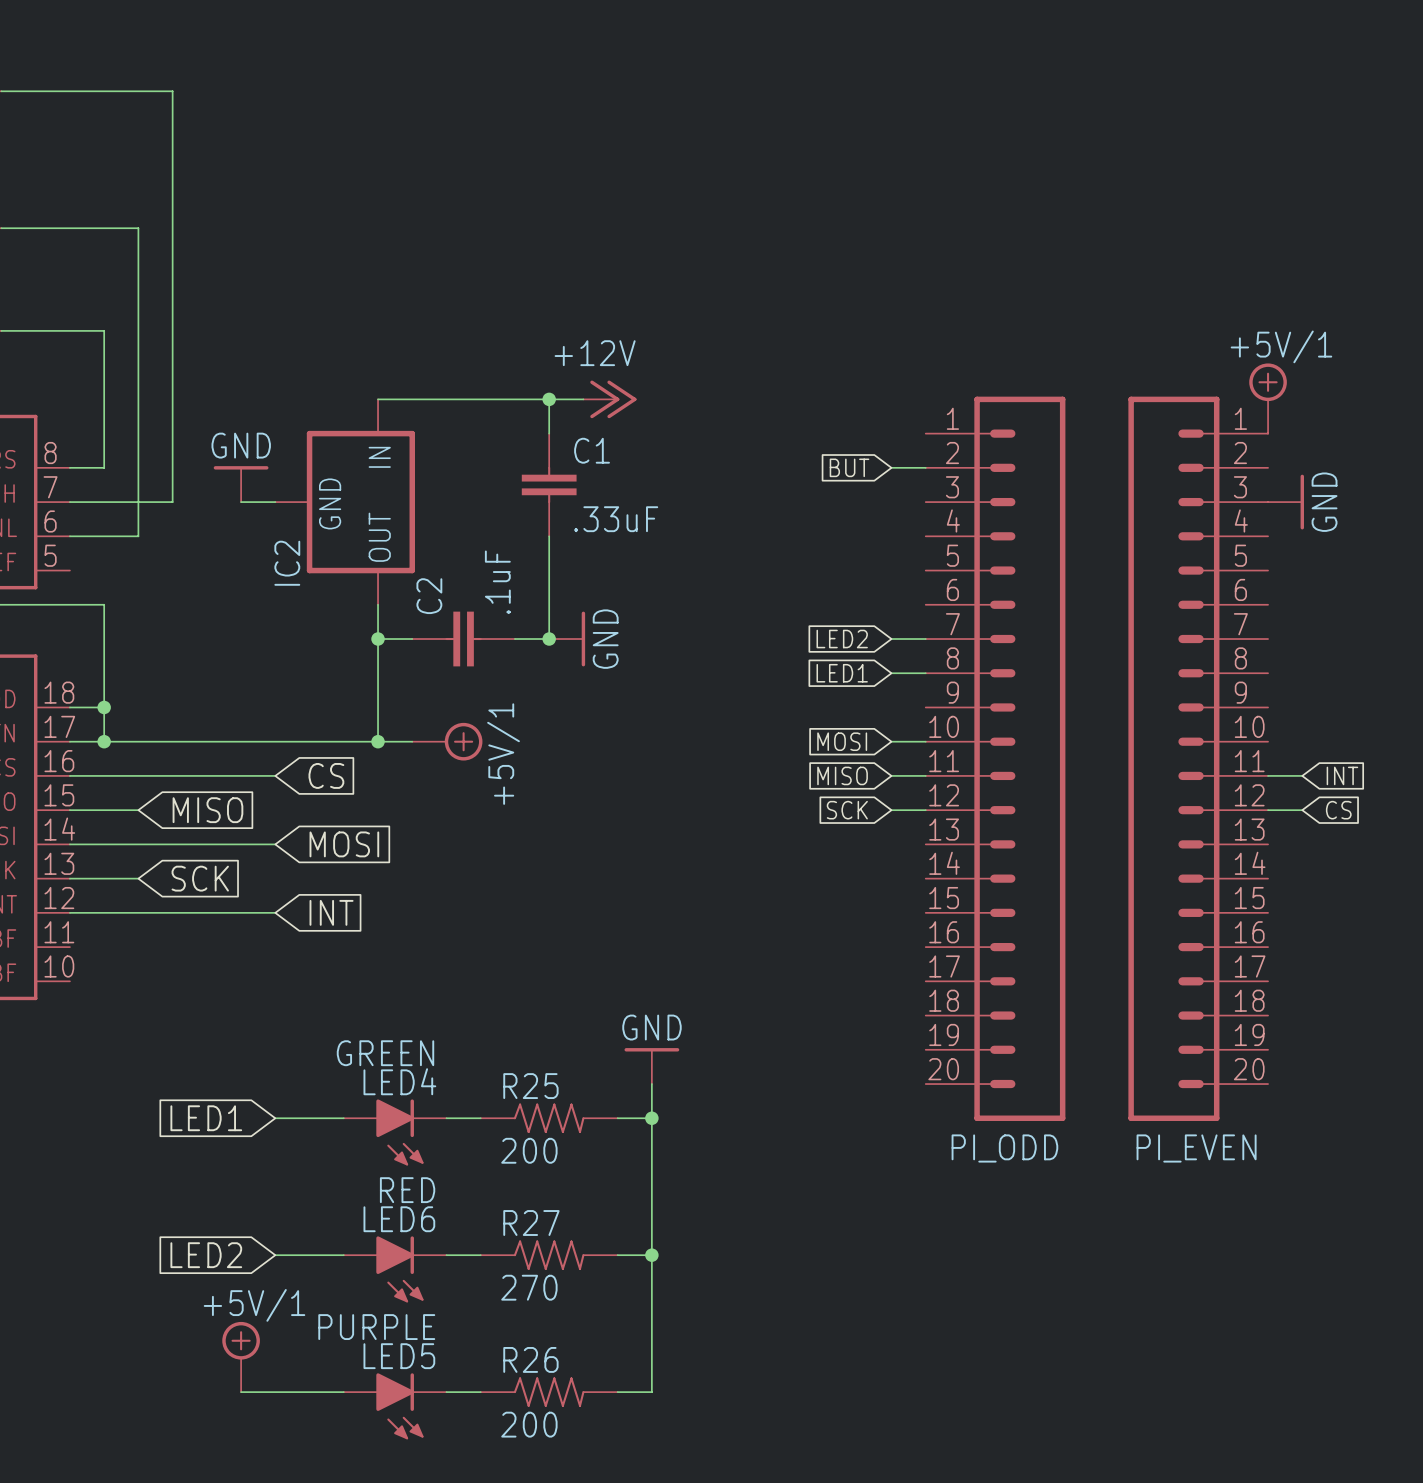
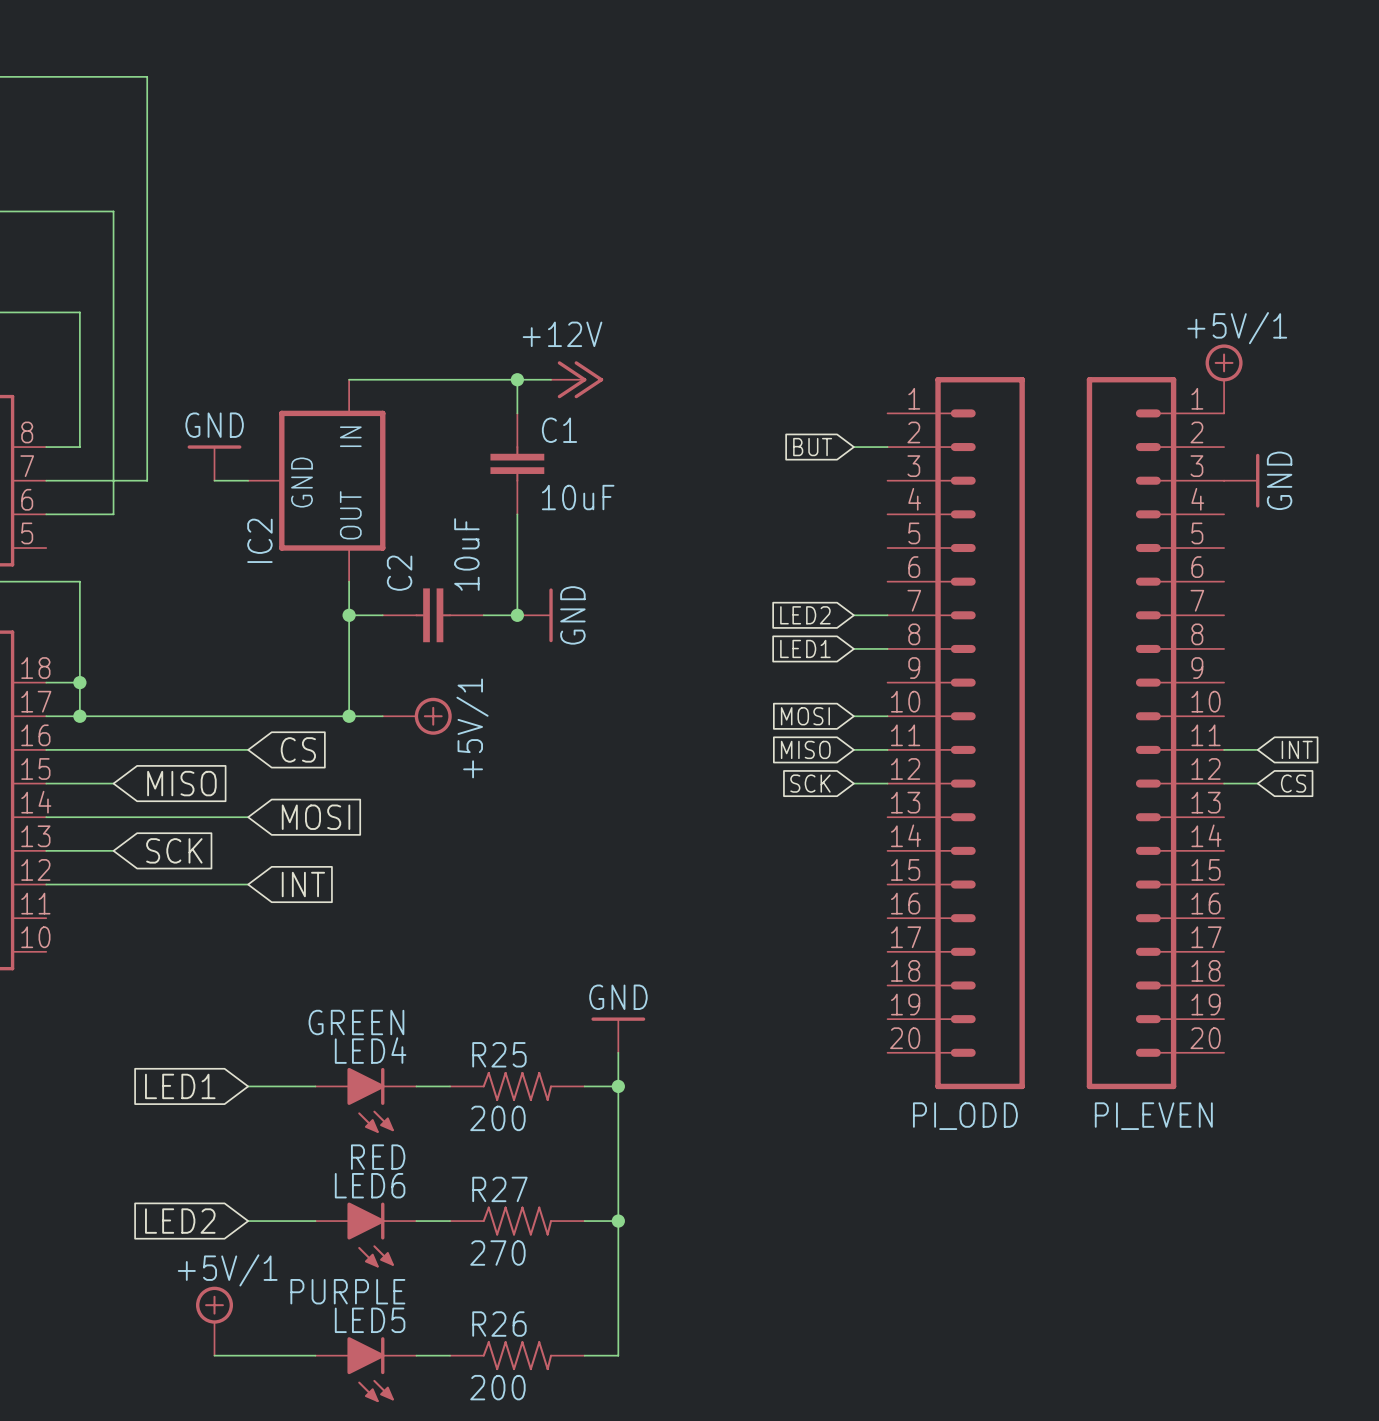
C1 value: .33uF (616, 519) -> 10uF (578, 497)
C2 value: .1uF (497, 582) -> 10uF (466, 554)

